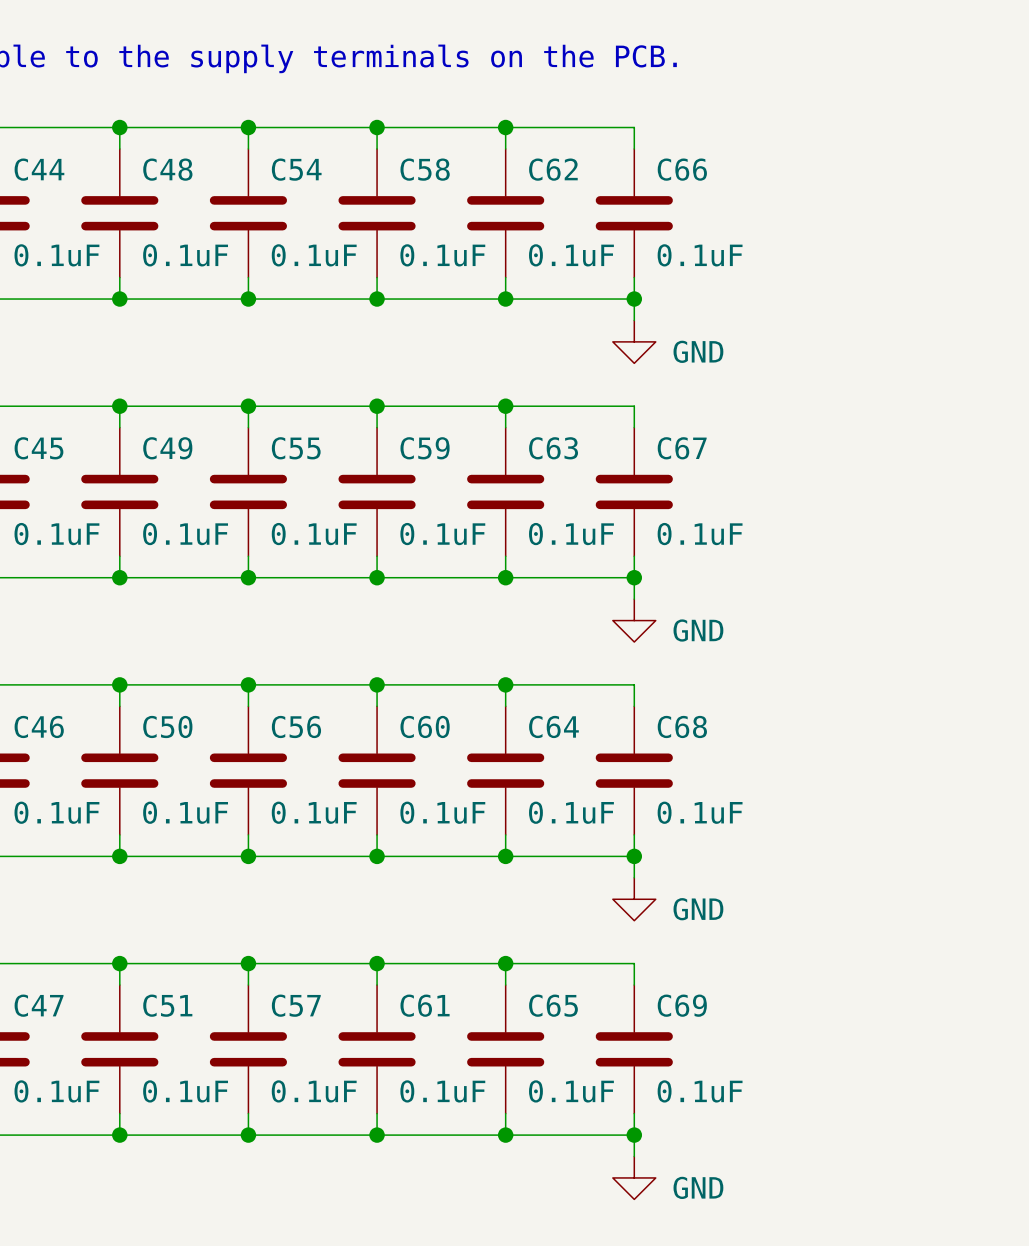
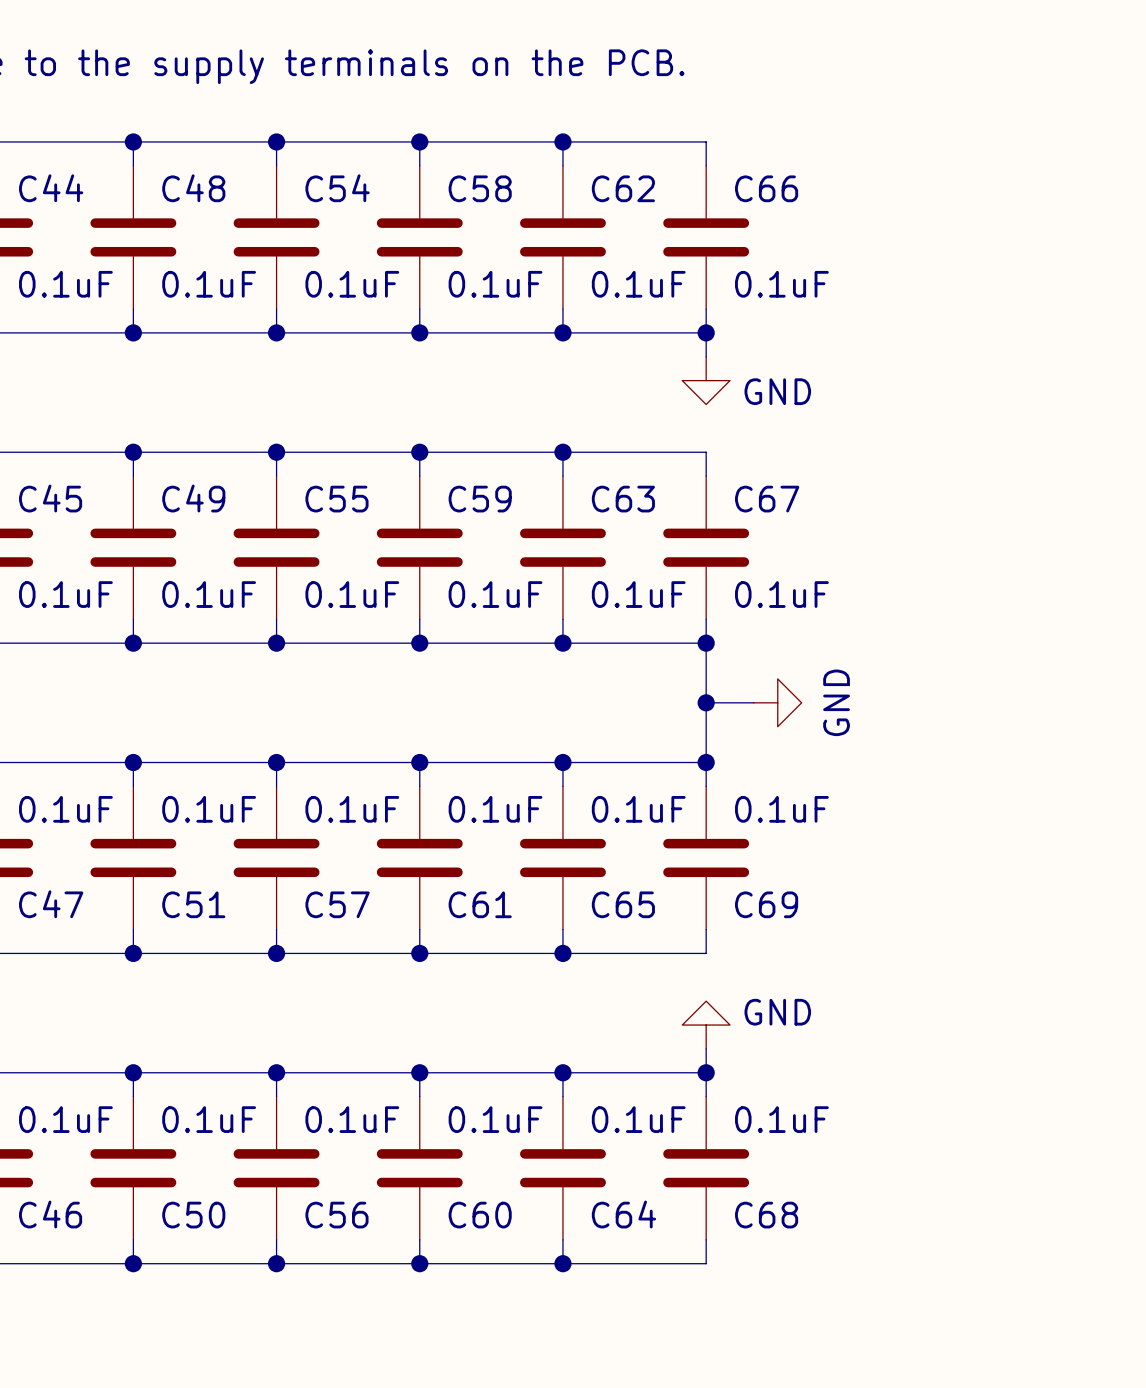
wire: none -> (706, 667) (706, 762)
power symbol rotation: 0° (634, 620) -> 90° counterclockwise (777, 702)
power symbol position: GND (634, 620) -> GND (777, 702)
wire: none -> (706, 702) (753, 702)
junction: none -> (706, 702)
junction: none -> (706, 762)
C46 name: C46 (39, 726) -> C47 (51, 904)
C50 name: C50 (167, 726) -> C51 (193, 904)
C56 name: C56 (296, 726) -> C57 (337, 904)
C60 name: C60 (425, 726) -> C61 (480, 904)
C64 name: C64 (553, 726) -> C65 (623, 904)
C68 name: C68 (682, 726) -> C69 (766, 904)
C46 value position: 0.1uF (56, 812) -> 0.1uF (65, 809)
C50 value position: 0.1uF (185, 812) -> 0.1uF (209, 809)
C56 value position: 0.1uF (314, 812) -> 0.1uF (352, 809)
C60 value position: 0.1uF (442, 812) -> 0.1uF (495, 809)
C64 value position: 0.1uF (571, 812) -> 0.1uF (638, 809)
C68 value position: 0.1uF (700, 812) -> 0.1uF (781, 809)
wire: (634, 856) (634, 877) -> (706, 1048) (706, 1072)
junction: (634, 856) -> none
power symbol rotation: 0° (634, 899) -> 180° (706, 1025)
junction: none -> (706, 1072)
C47 name: C47 (39, 1005) -> C46 (50, 1214)
C51 name: C51 (167, 1005) -> C50 (193, 1215)
C57 name: C57 (296, 1005) -> C56 (336, 1215)
C61 name: C61 (425, 1005) -> C60 (480, 1215)
C65 name: C65 (553, 1005) -> C64 (623, 1214)
C69 name: C69 (682, 1005) -> C68 (766, 1215)
C47 value position: 0.1uF (56, 1091) -> 0.1uF (65, 1119)
C51 value position: 0.1uF (185, 1091) -> 0.1uF (209, 1119)
C57 value position: 0.1uF (314, 1091) -> 0.1uF (352, 1119)
C61 value position: 0.1uF (442, 1091) -> 0.1uF (495, 1119)
C65 value position: 0.1uF (571, 1091) -> 0.1uF (638, 1119)
C69 value position: 0.1uF (700, 1091) -> 0.1uF (781, 1119)
wire: (634, 1135) (634, 1156) -> none
junction: (634, 1135) -> none
power symbol: GND (634, 1177) -> none

